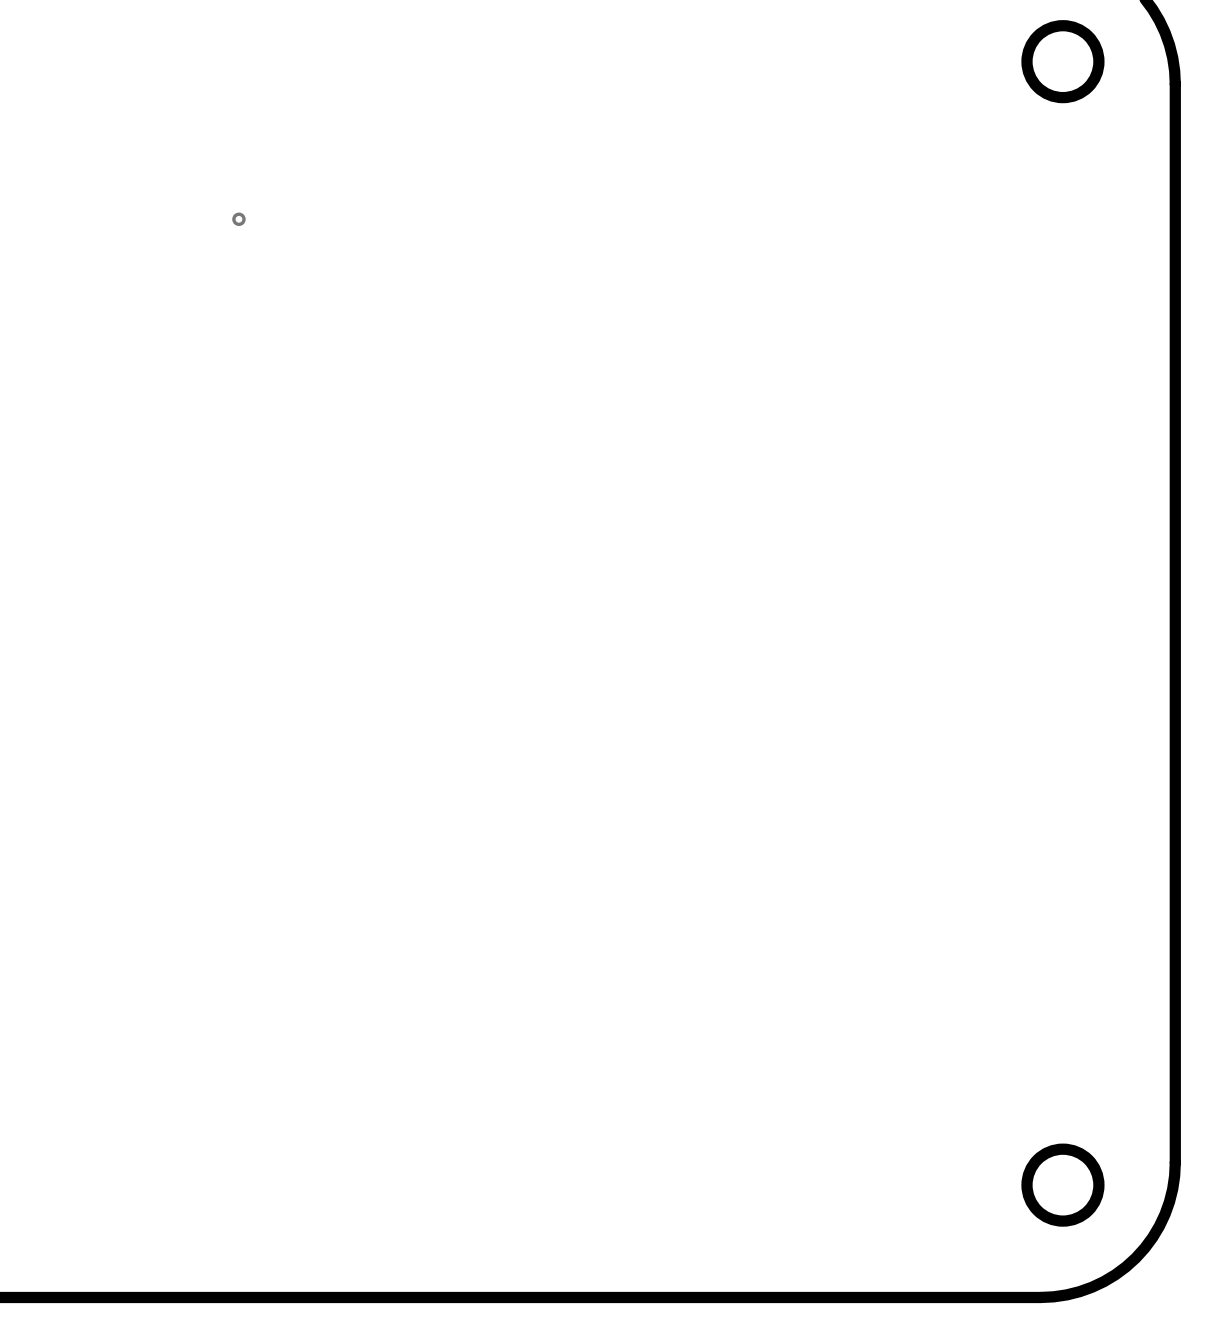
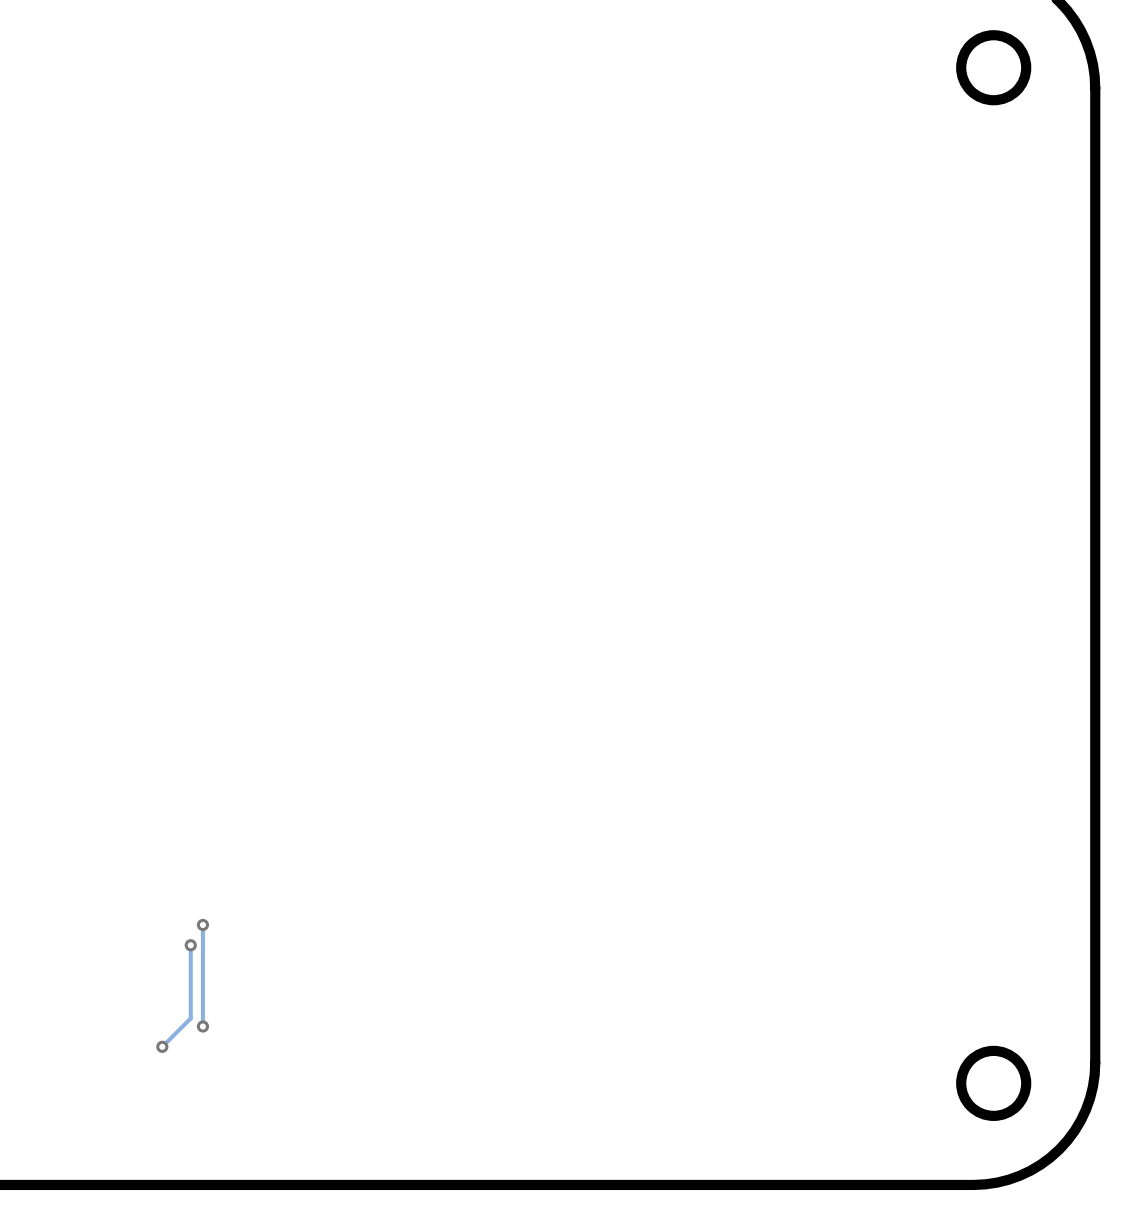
via: (238, 219) -> none
track: none -> (202, 924) (202, 1026)
via: none -> (202, 924)
track: none -> (190, 945) (190, 1018) (162, 1046)
via: none -> (190, 945)
via: none -> (202, 1026)
via: none -> (162, 1046)

